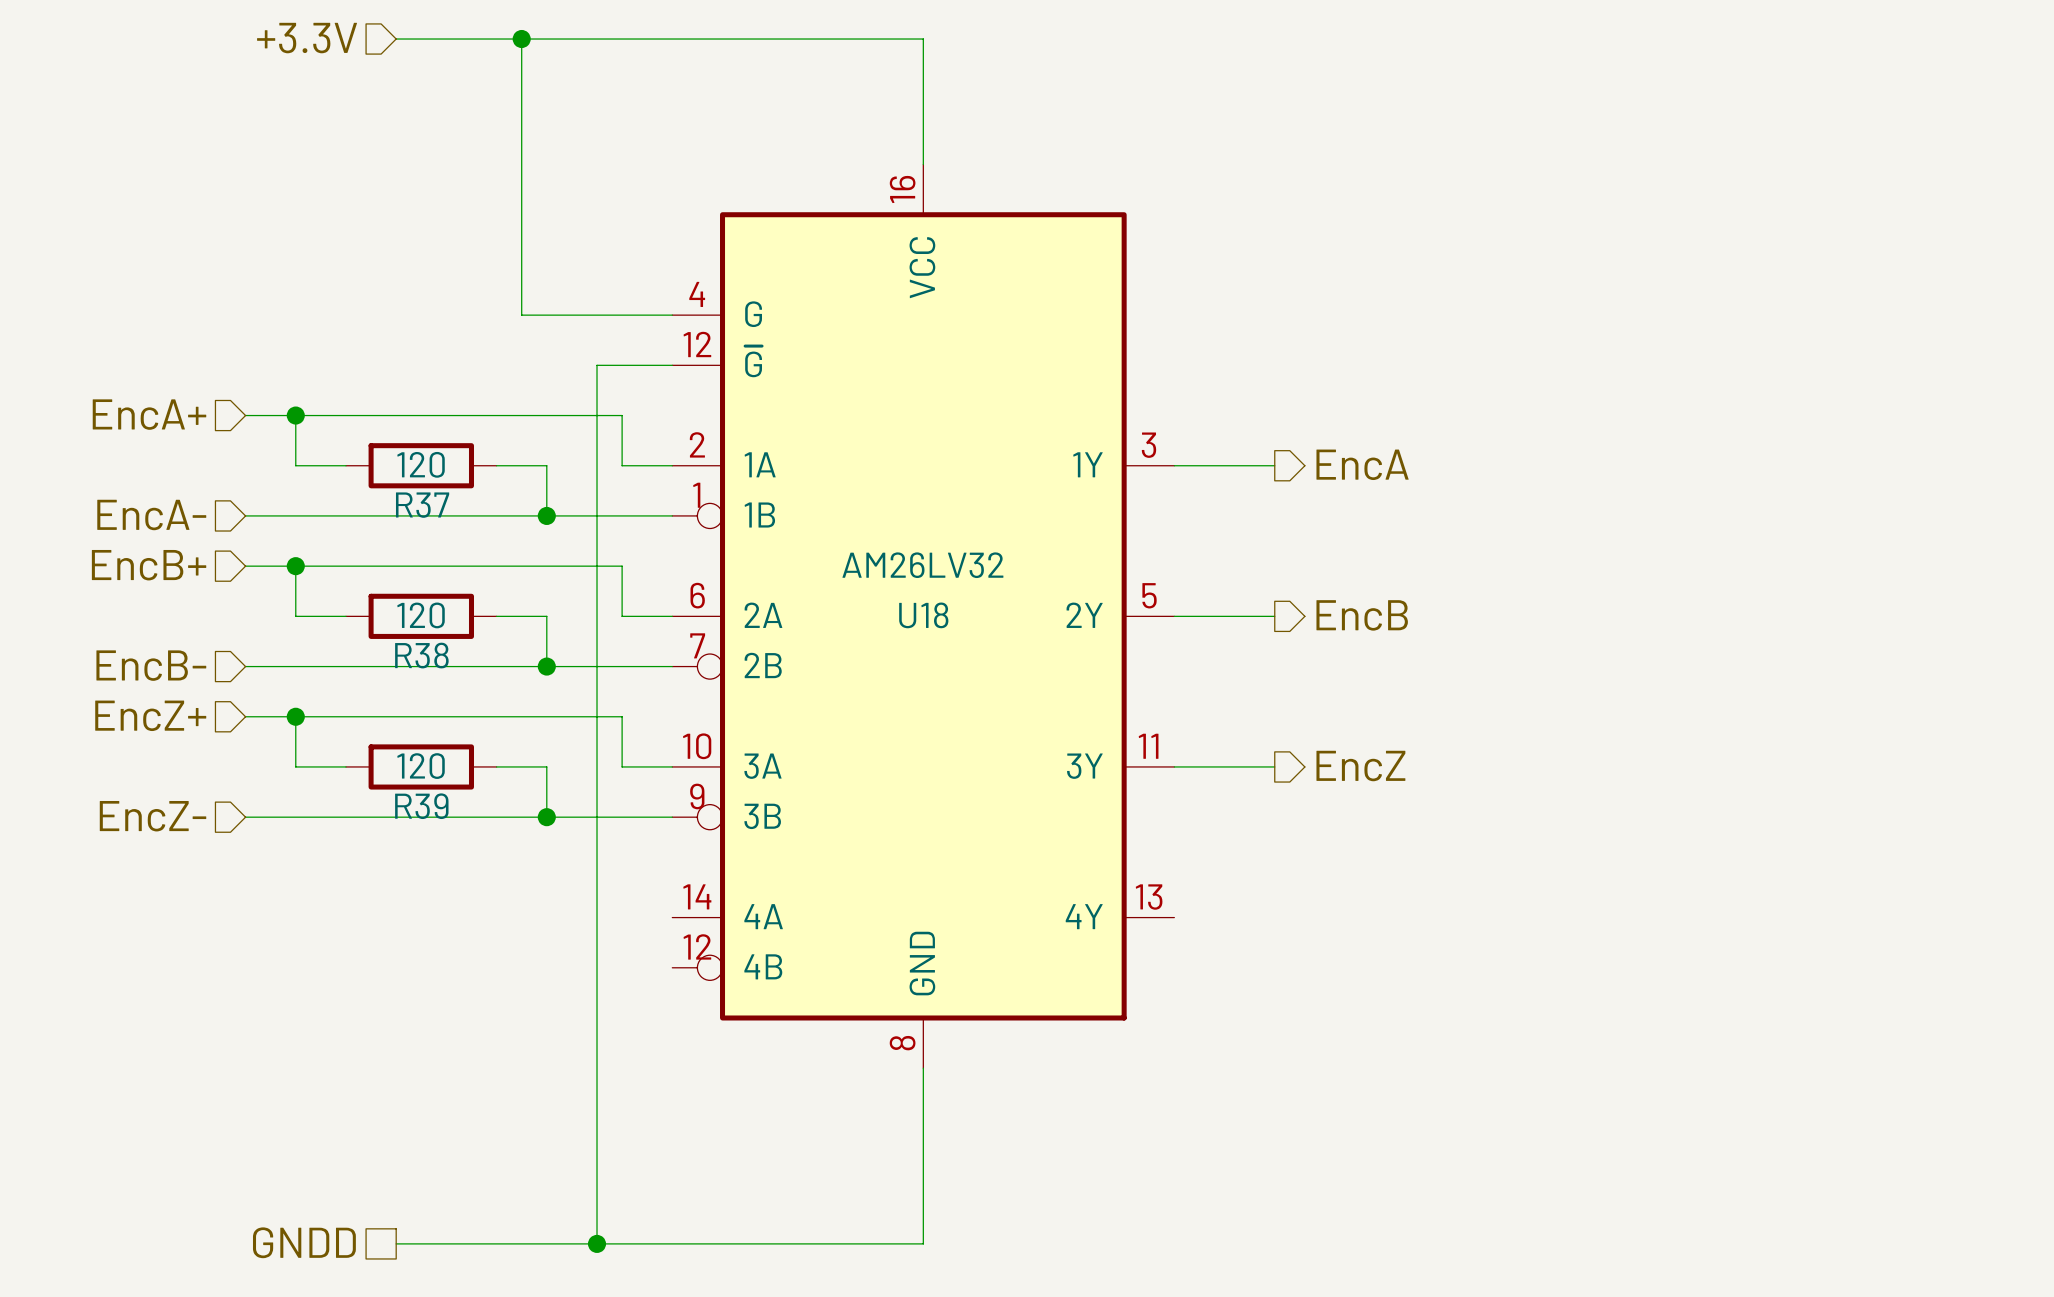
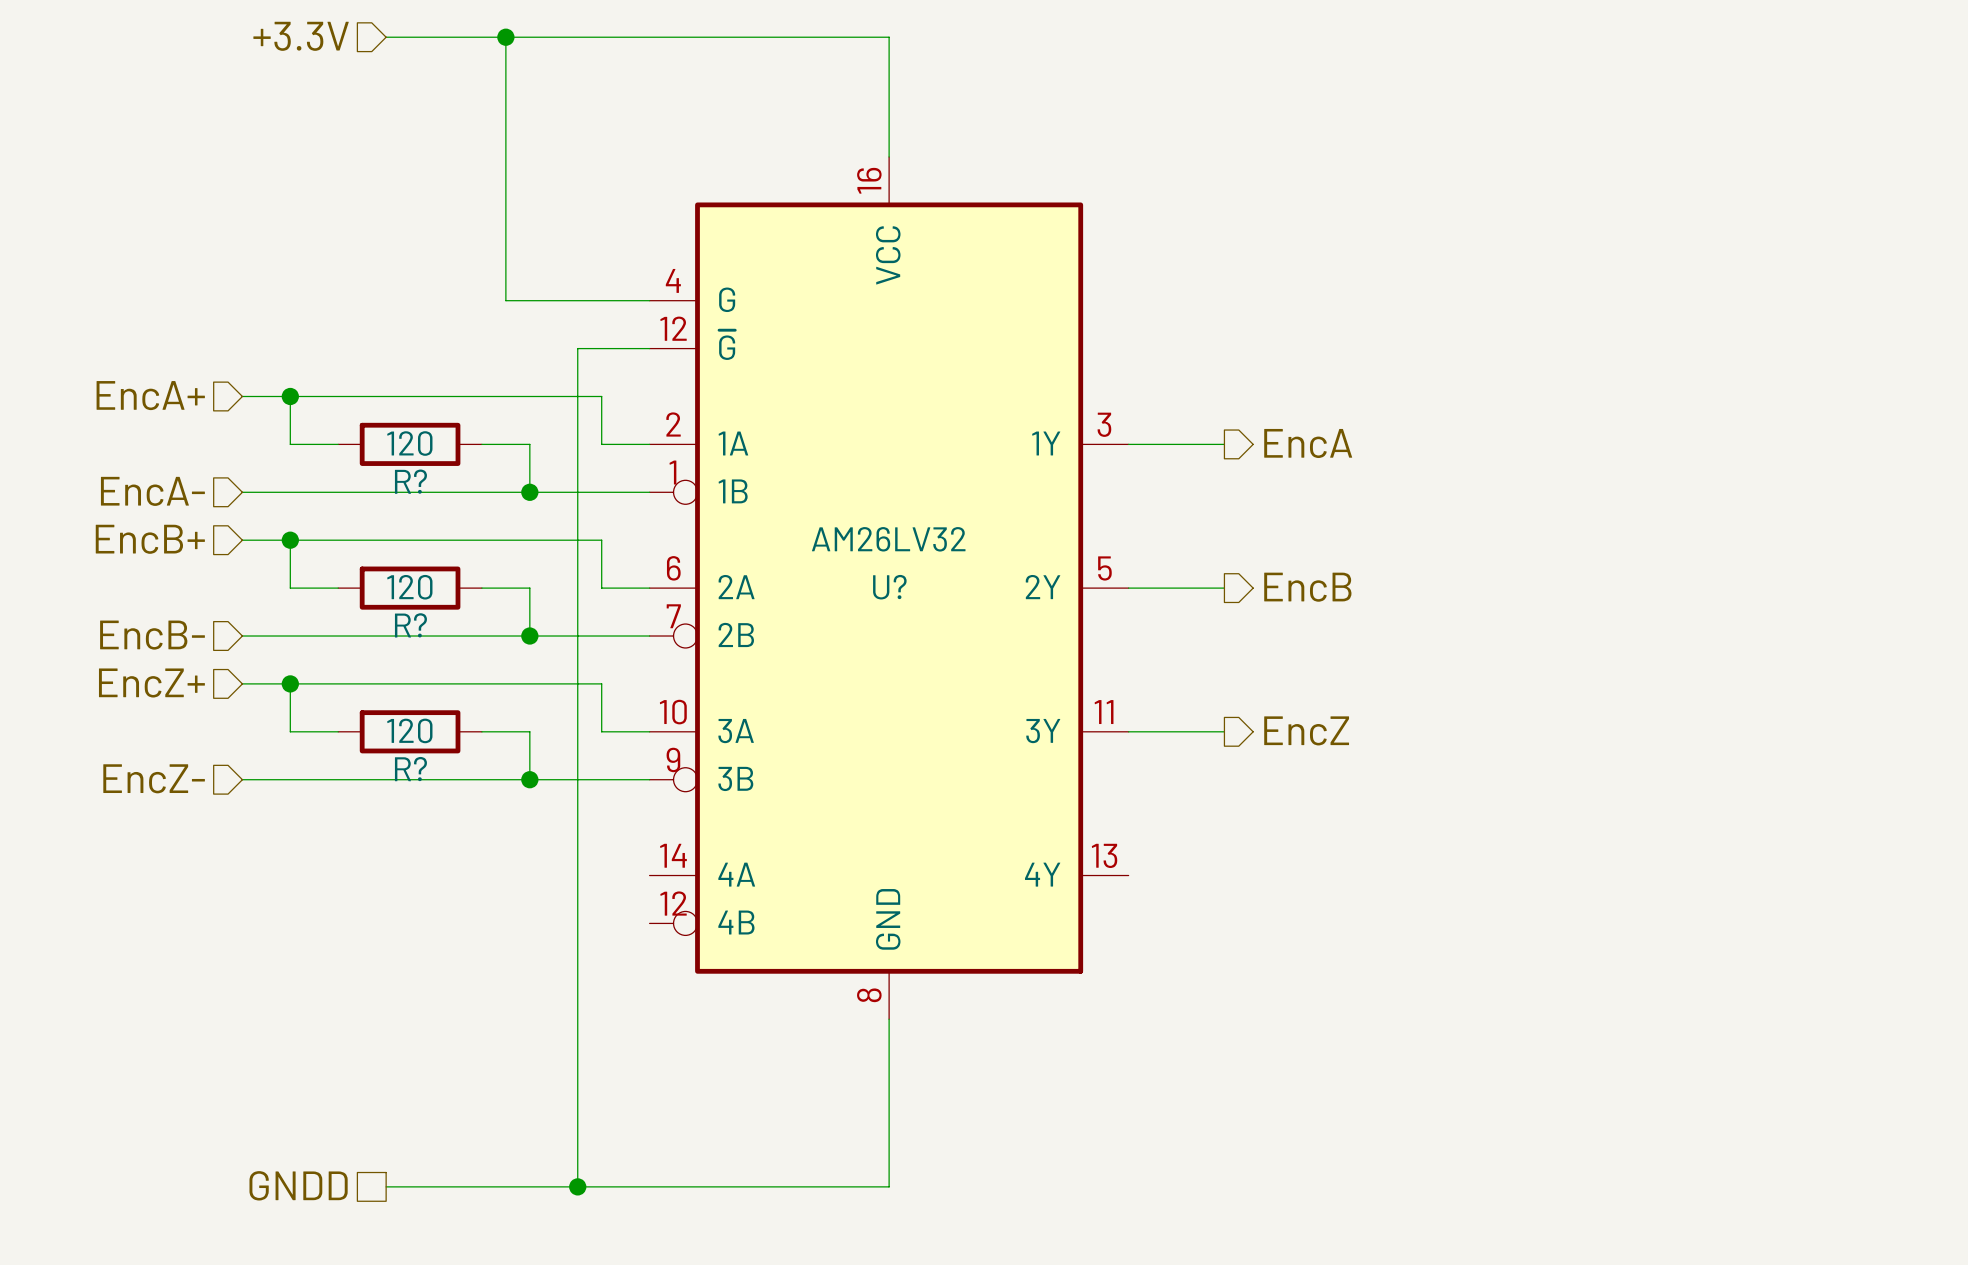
R37 name: R37 (422, 505) -> R? (410, 481)
U18 name: U18 (923, 615) -> U? (889, 587)
R38 name: R38 (421, 655) -> R? (410, 625)
R39 name: R39 (421, 806) -> R? (410, 769)

